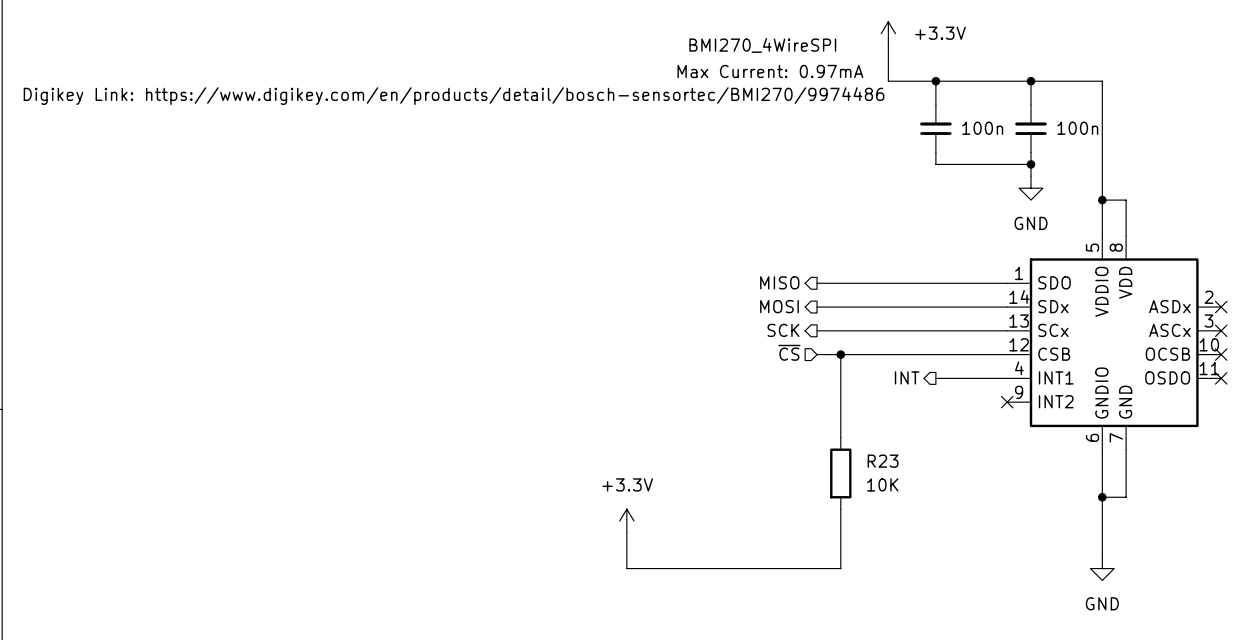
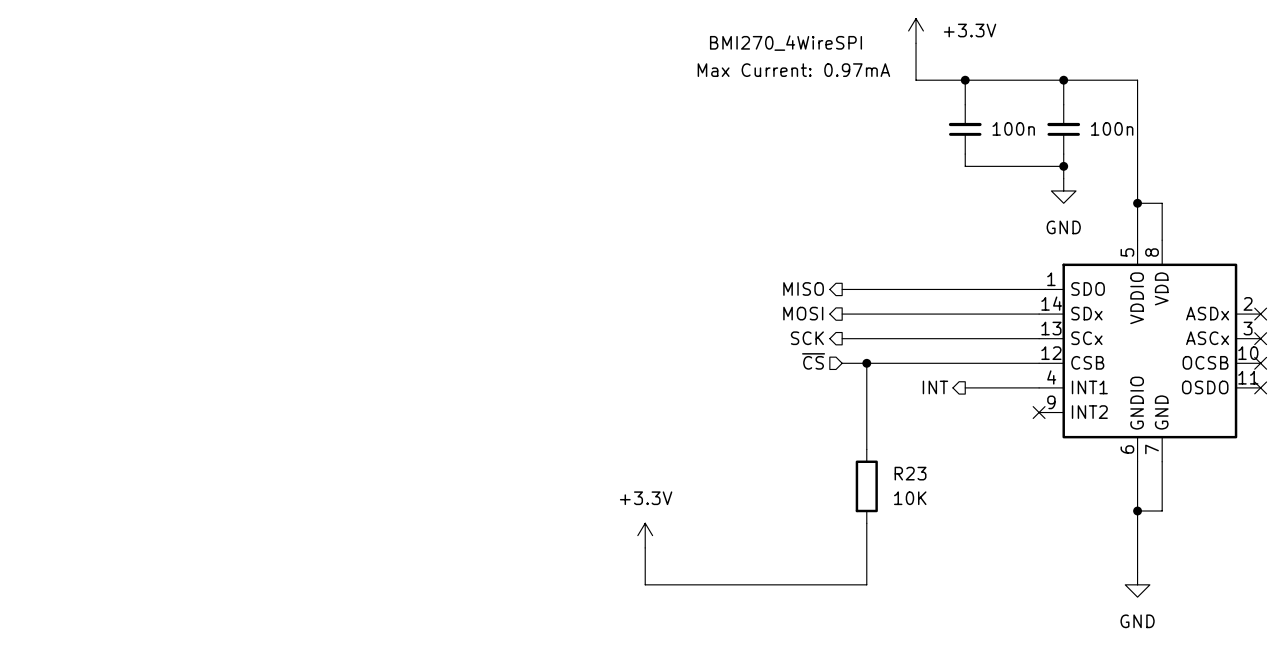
label: Digikey Link: https://www.digikey.com/en/products/detail/bosch-sensortec/BMI270/9974486 (454, 96) -> none

